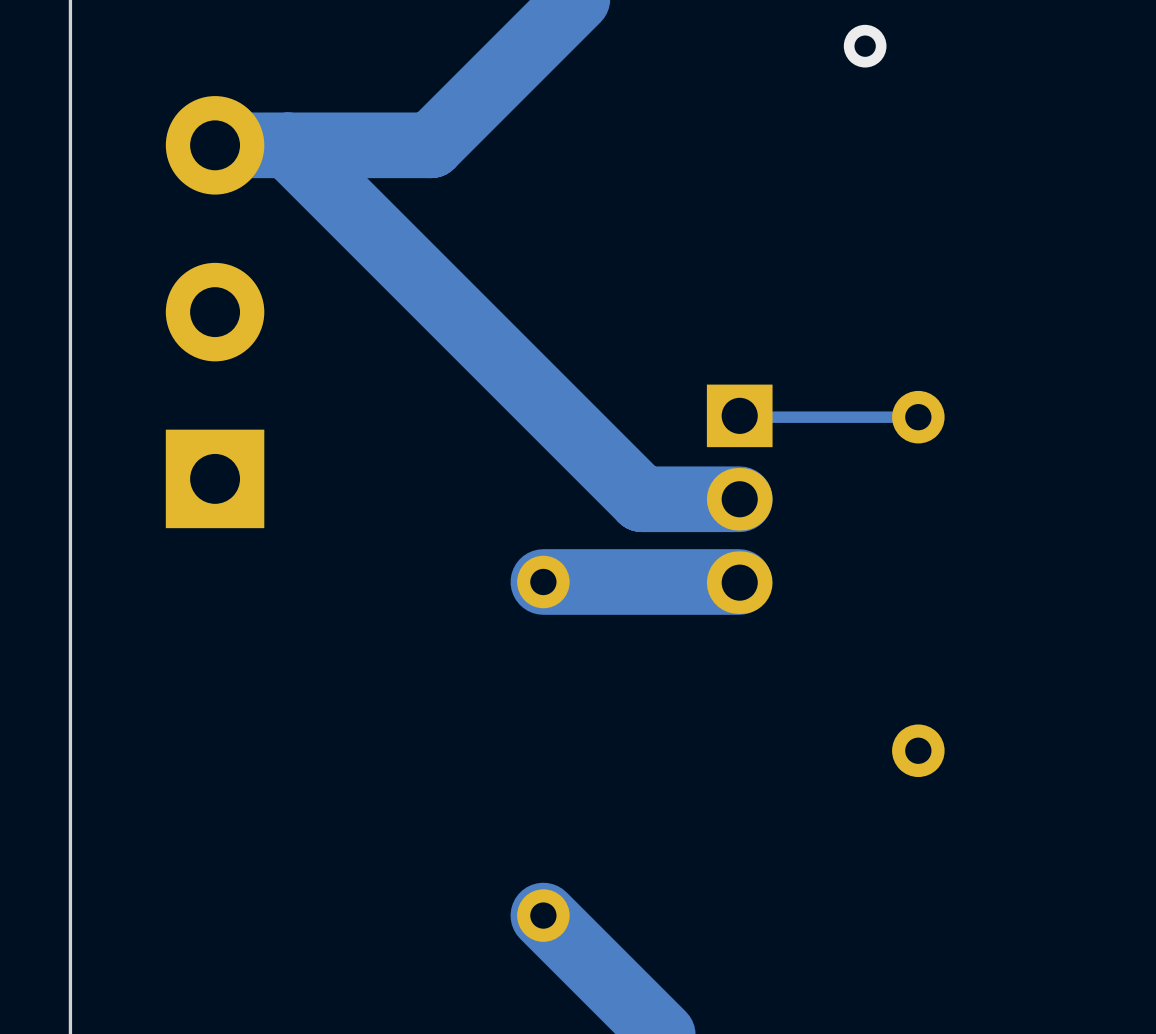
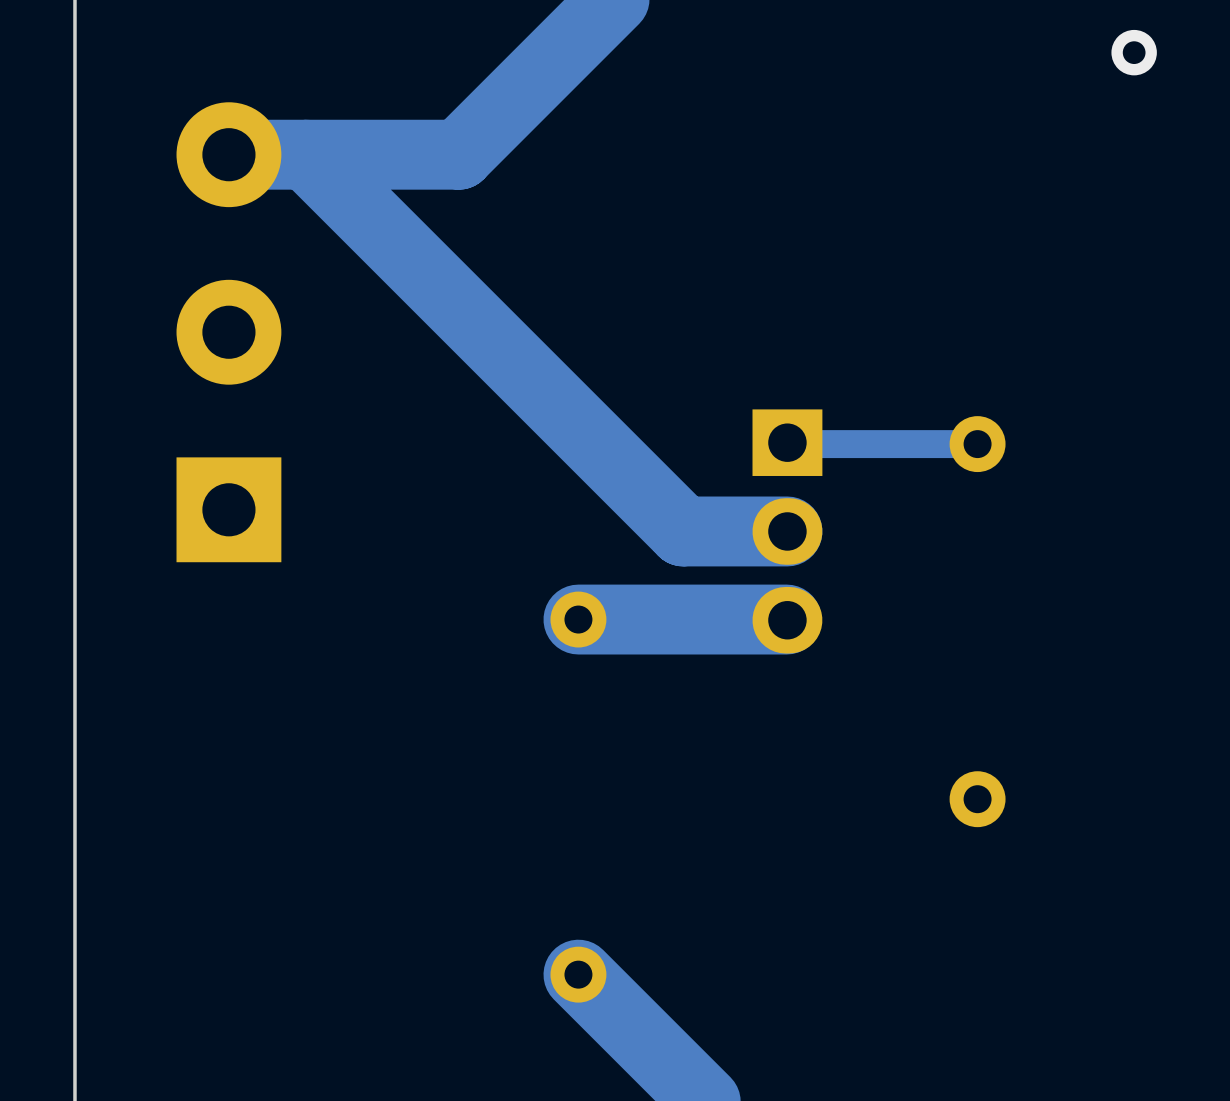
via: (865, 46) -> none
via: none -> (1134, 52)
track width: thin (918, 417) (741, 417) -> thick (977, 444) (788, 444)

